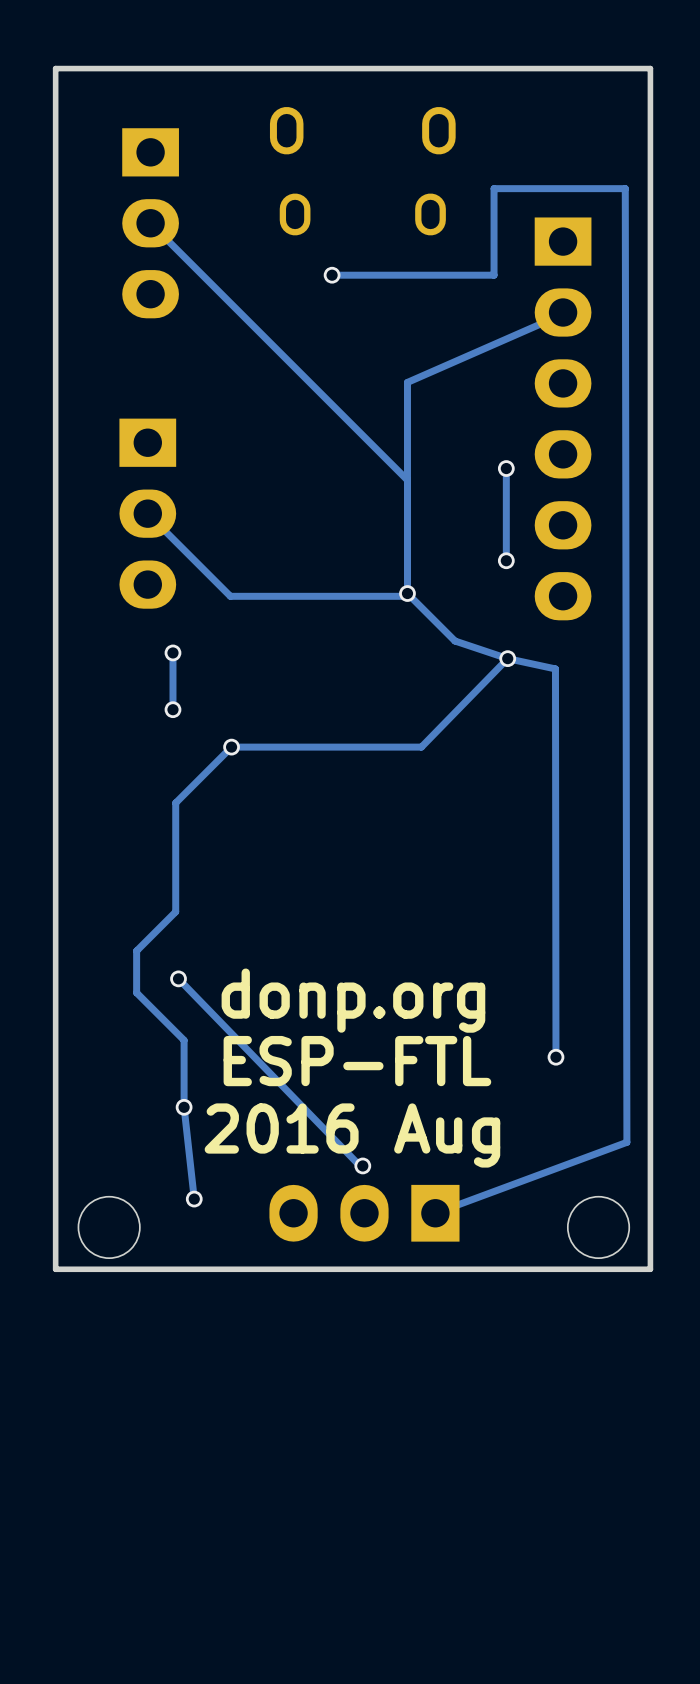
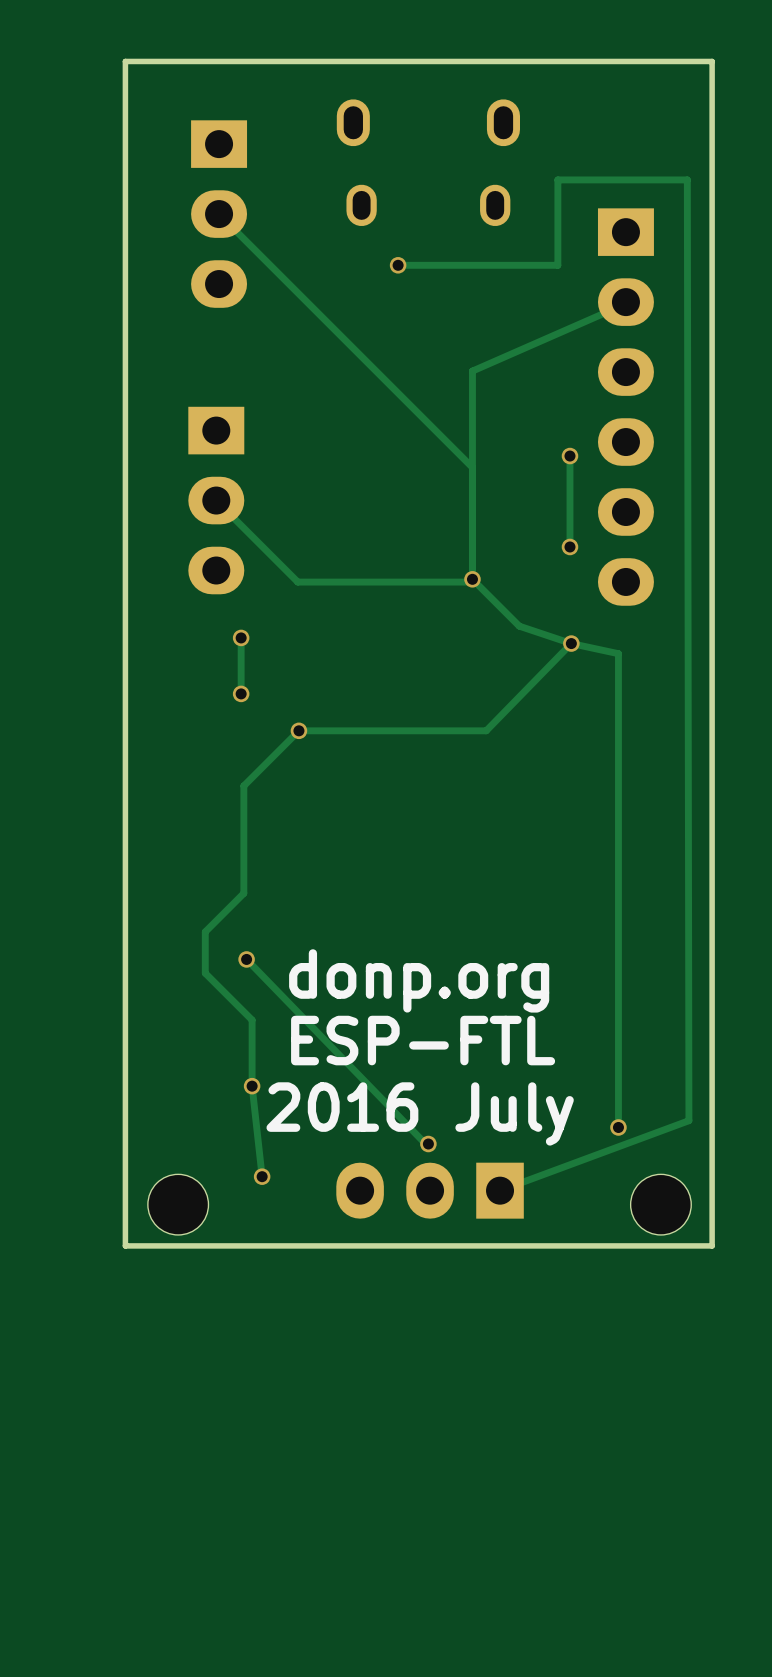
track: (555, 668) (555, 1057) -> (618, 653) (618, 1127)
via position: (555, 1057) -> (618, 1127)
text: 2016 Aug (352, 1135) -> 2016 July (420, 1113)

